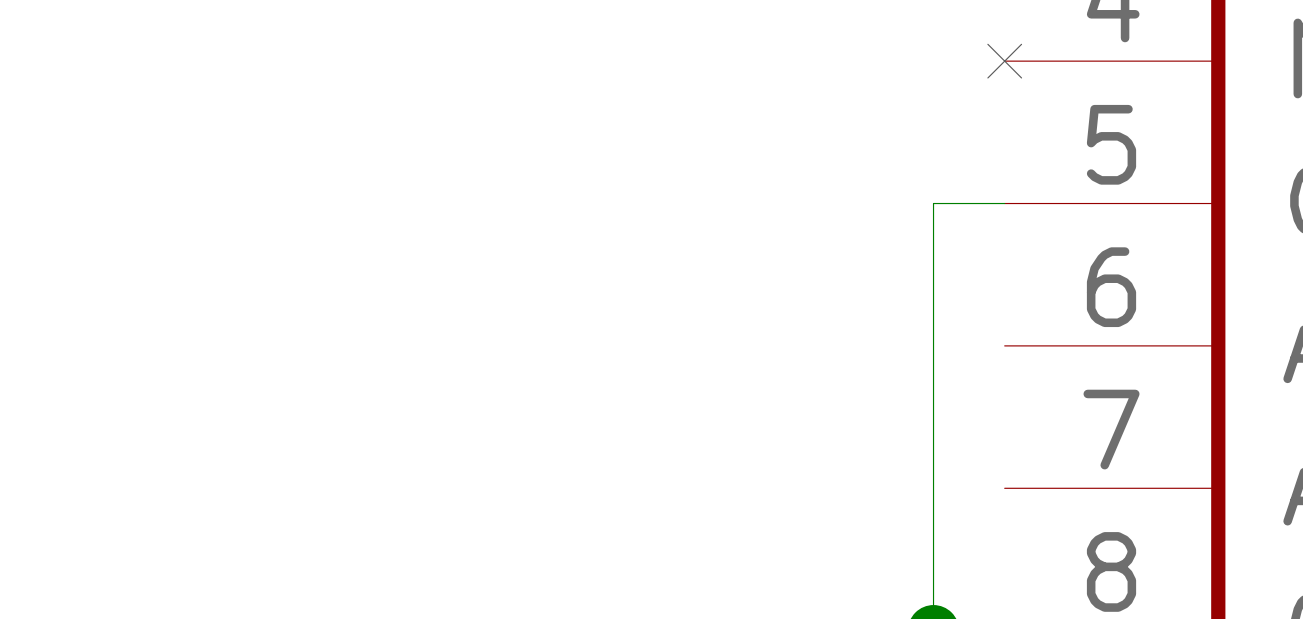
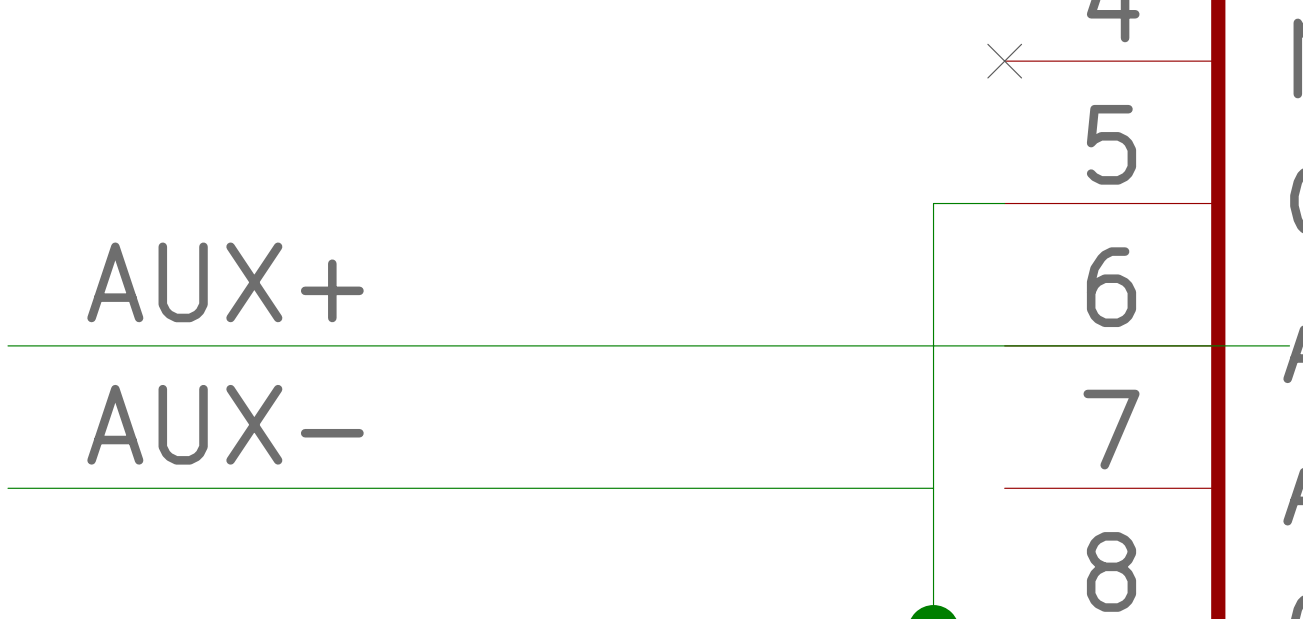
label: none -> AUX+ (225, 282)
wire: none -> (8, 345) (1289, 345)
label: none -> AUX- (225, 424)
wire: none -> (8, 488) (933, 488)

